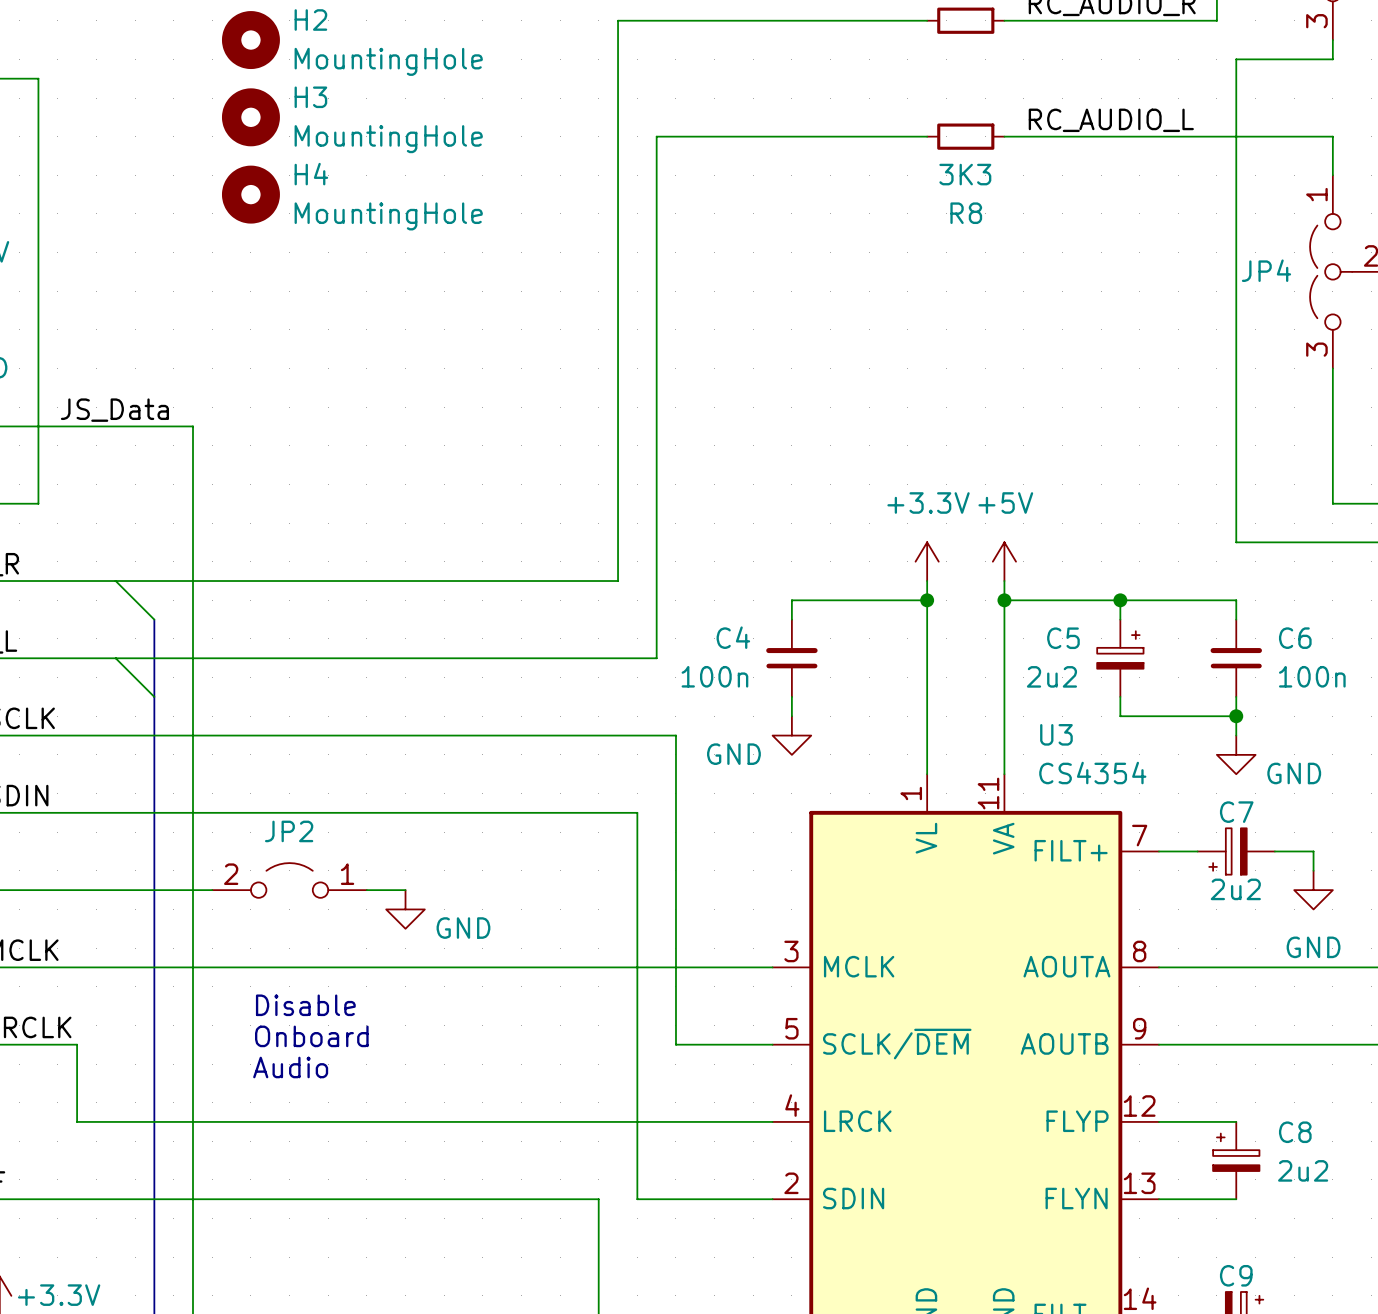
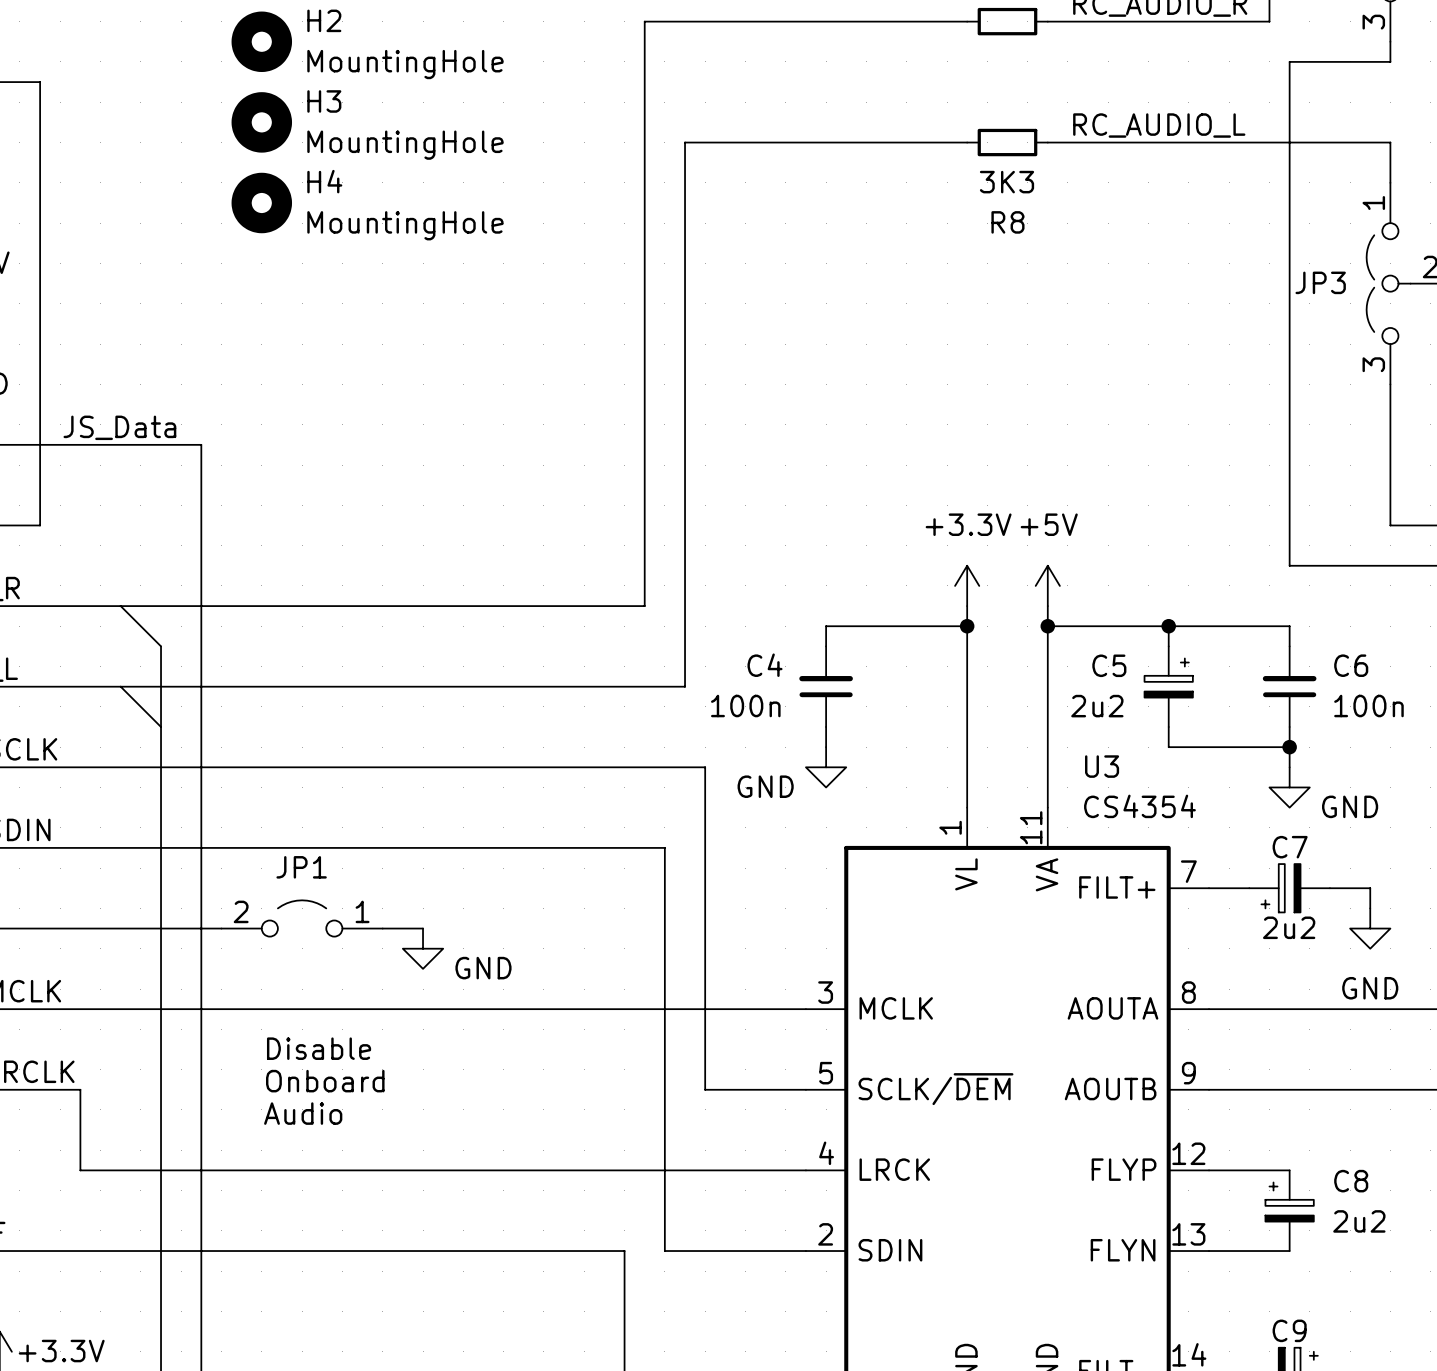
JP4 name: JP4 (1266, 270) -> JP3 (1320, 282)
JP2 name: JP2 (289, 831) -> JP1 (301, 867)

